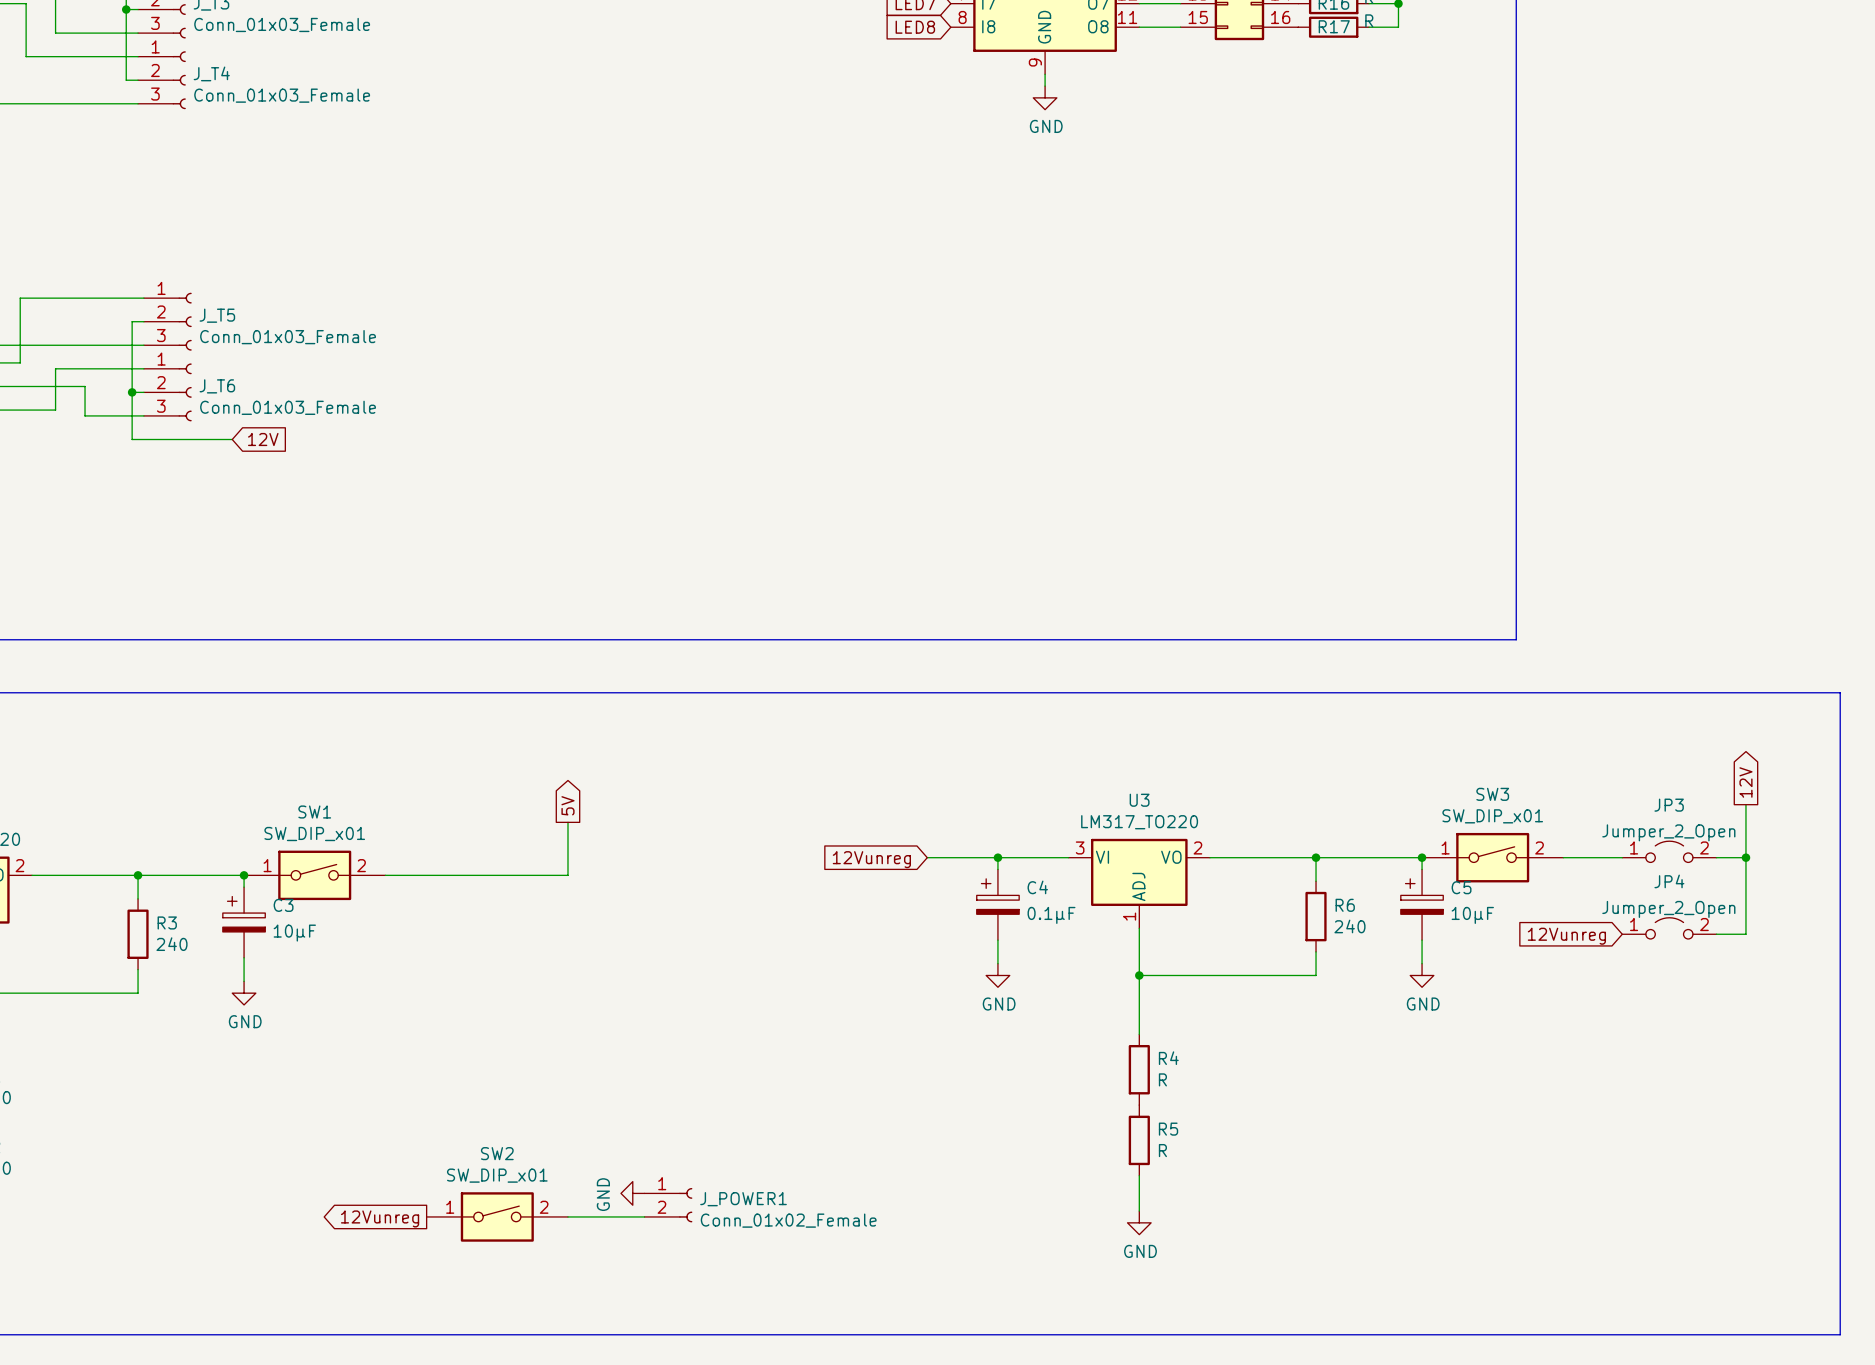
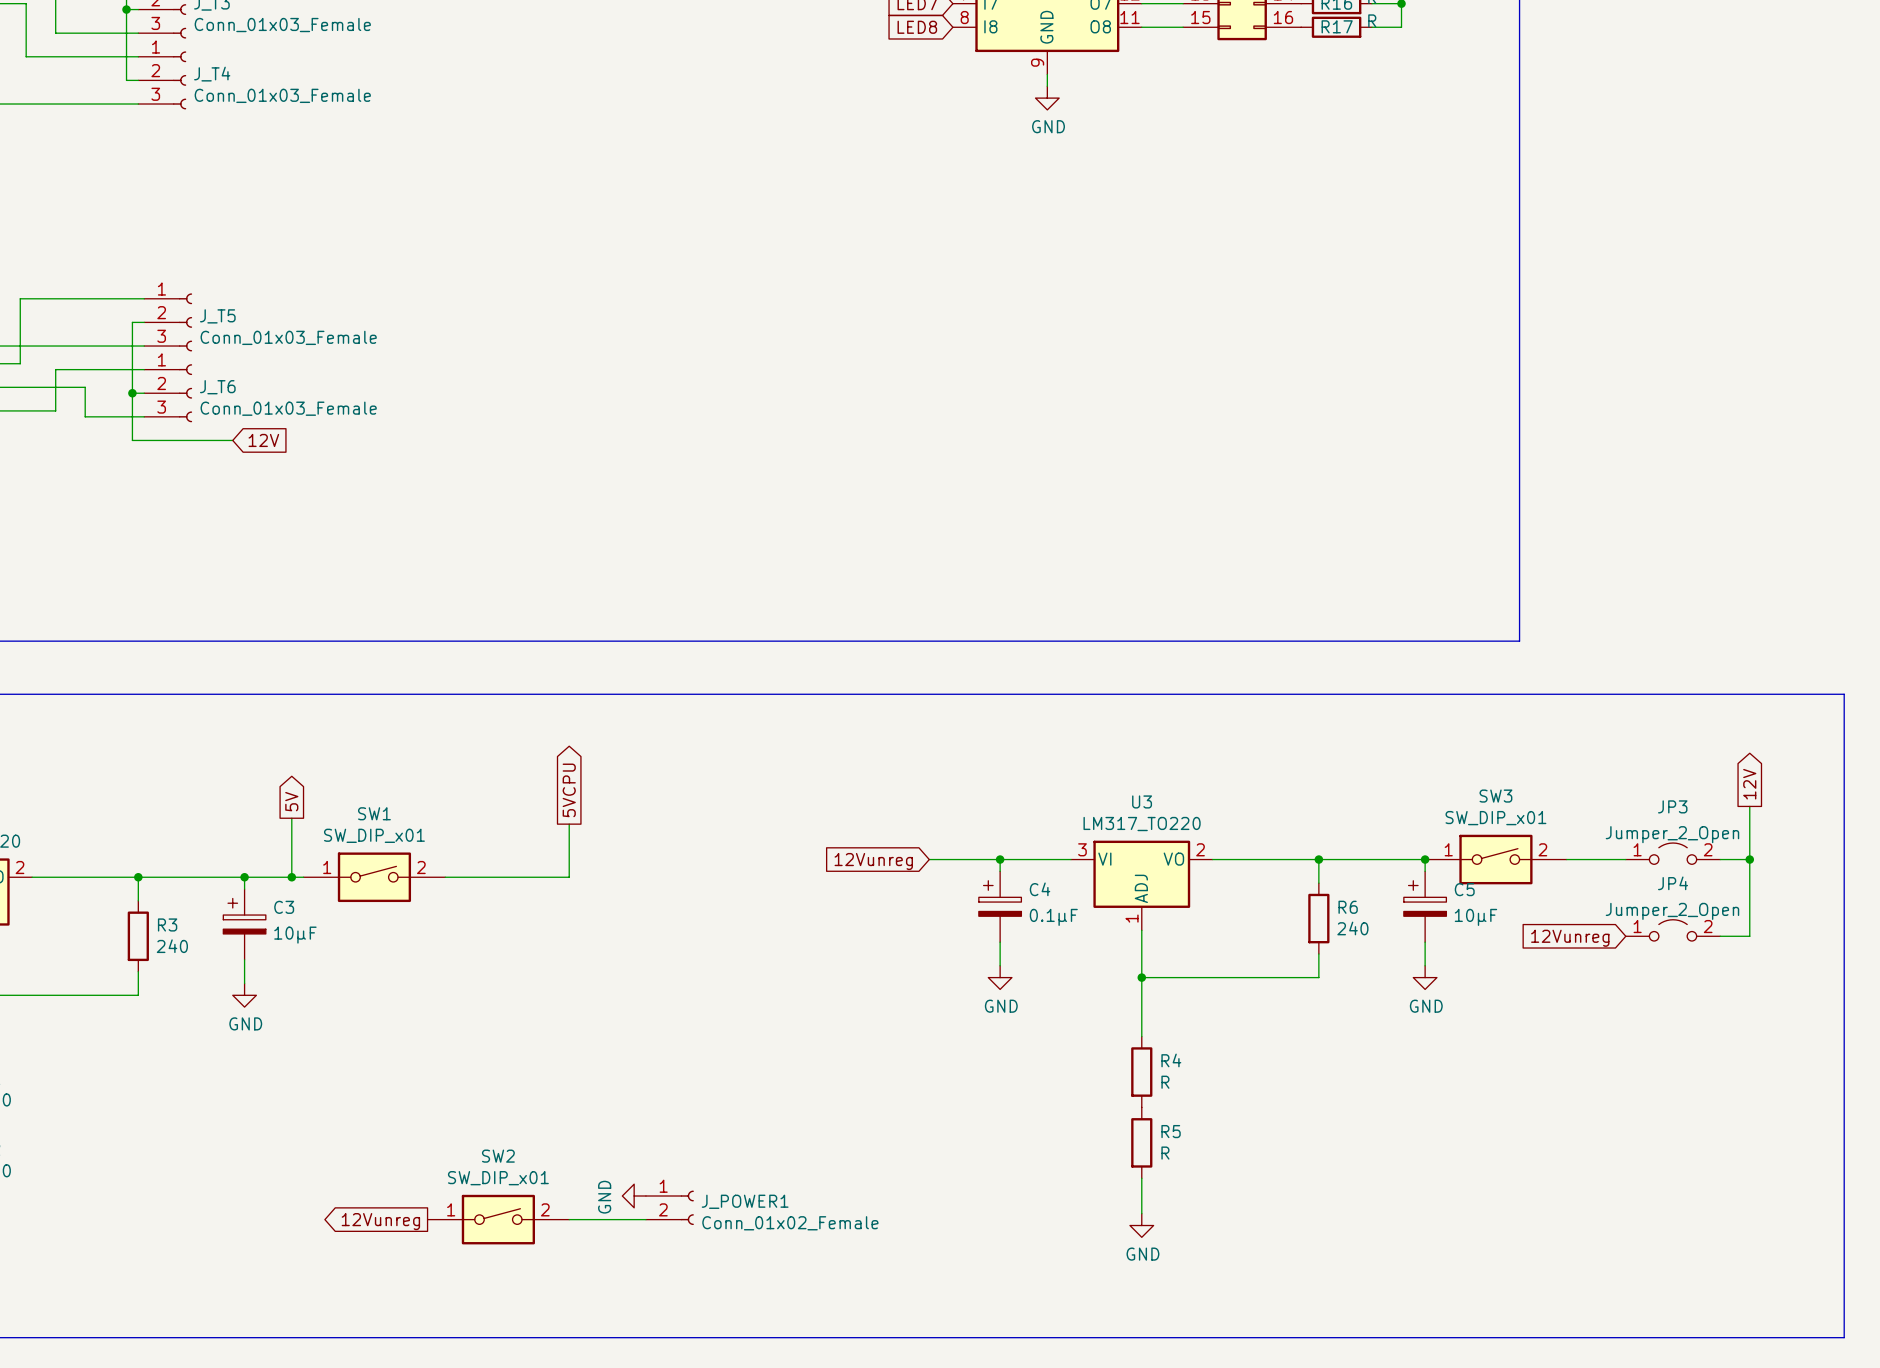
global label: none -> 5V (291, 801)
global label: 5V (567, 805) -> 5VCPU (569, 790)
wire: none -> (291, 818) (291, 877)
junction: none -> (291, 877)
SW1 position: (314, 875) -> (374, 877)

